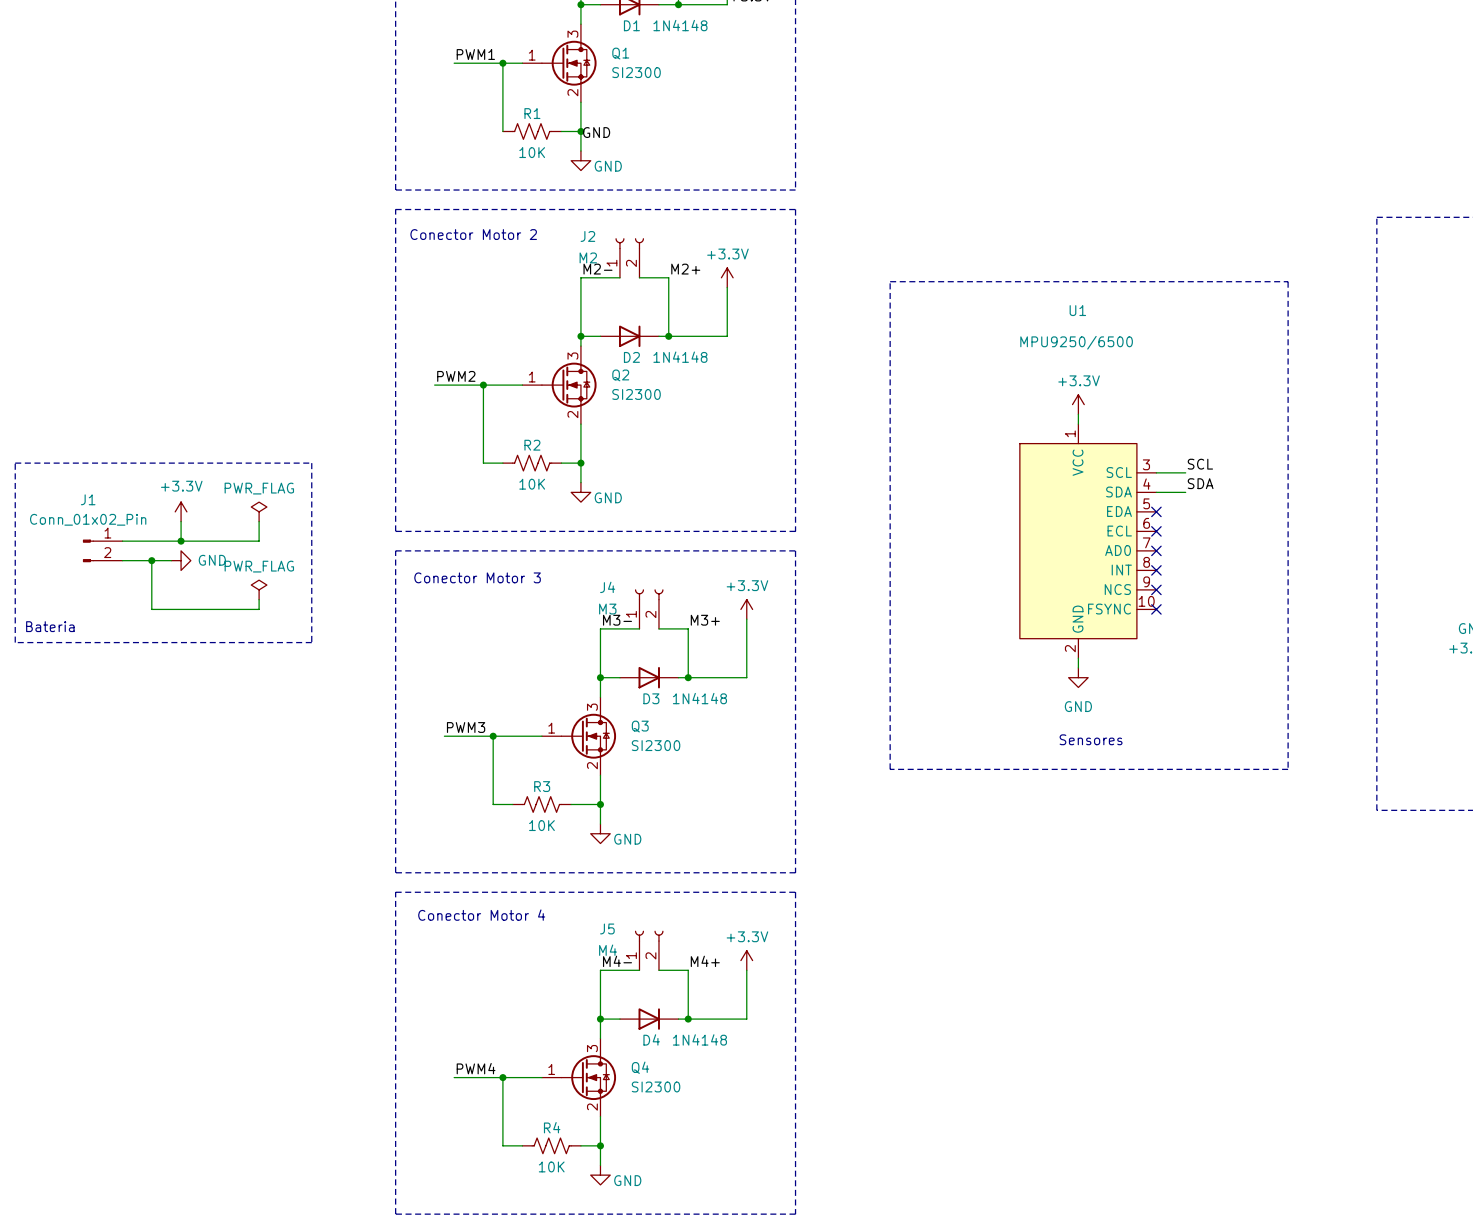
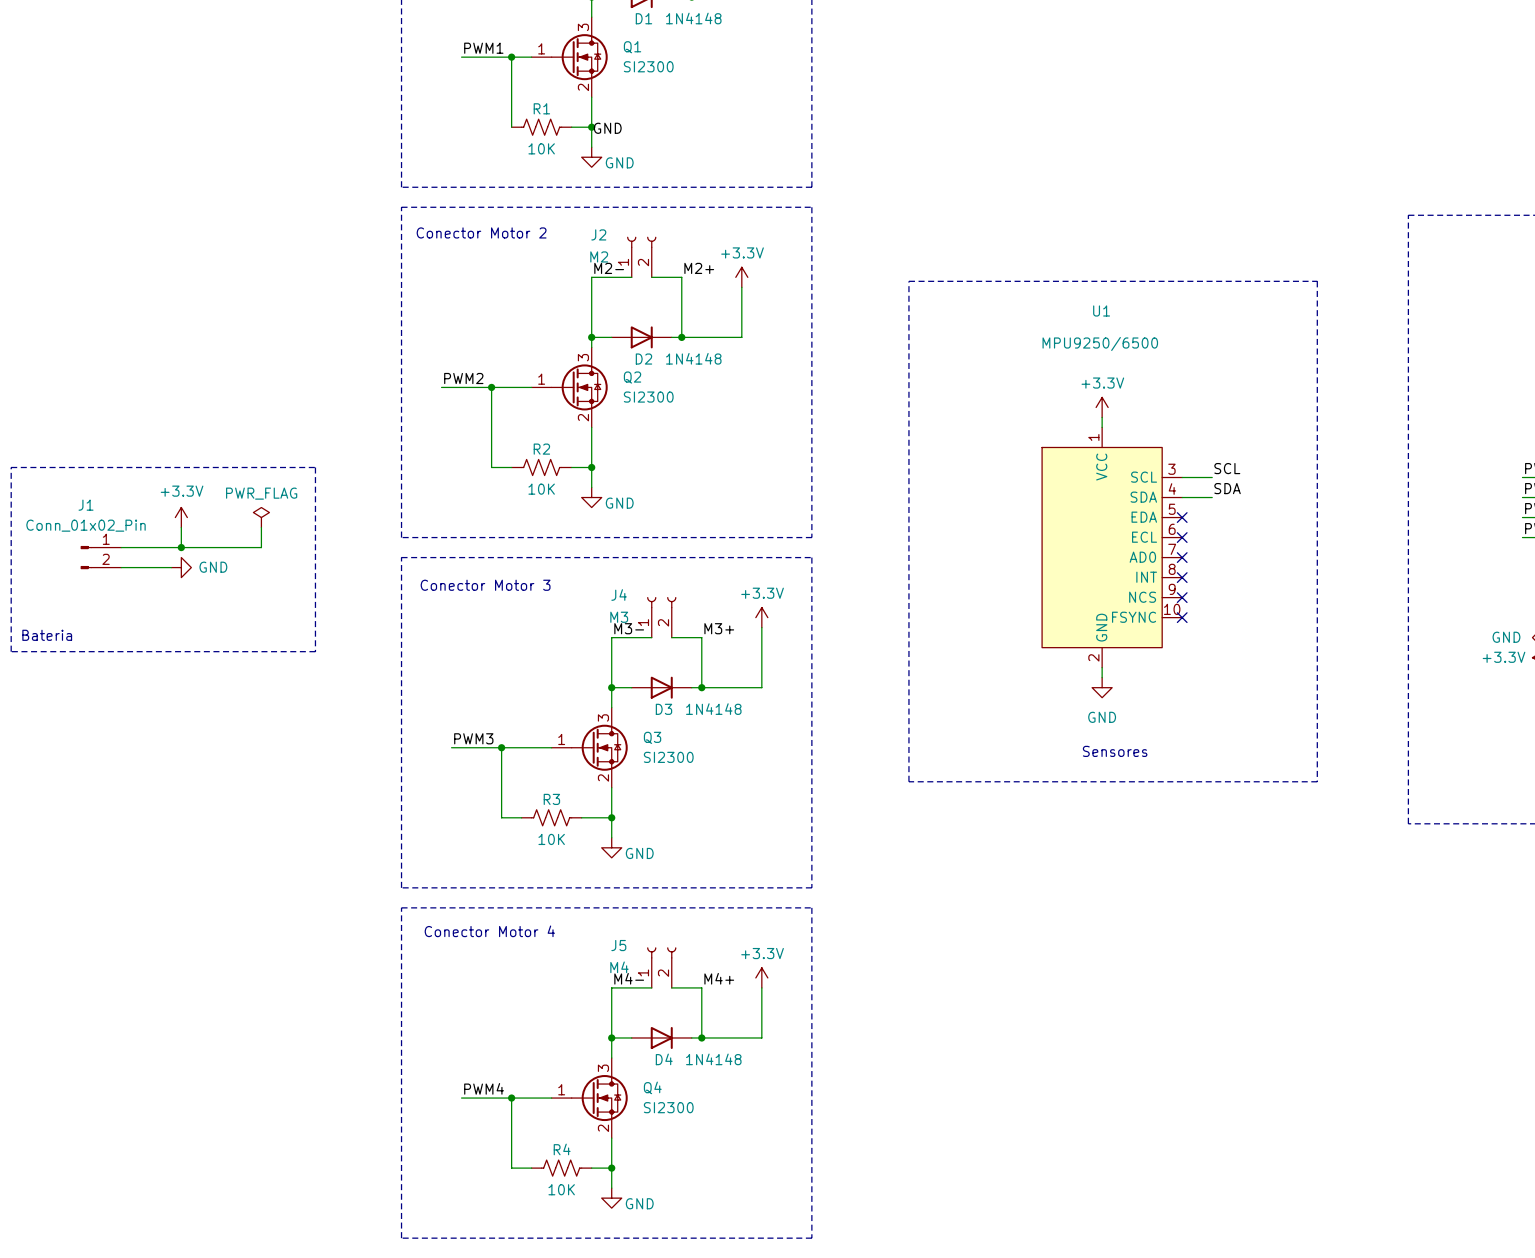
wire: (151, 560) (151, 609) (259, 609) (259, 599) -> none
junction: (151, 560) -> none
power symbol: PWR_FLAG (259, 589) -> none

